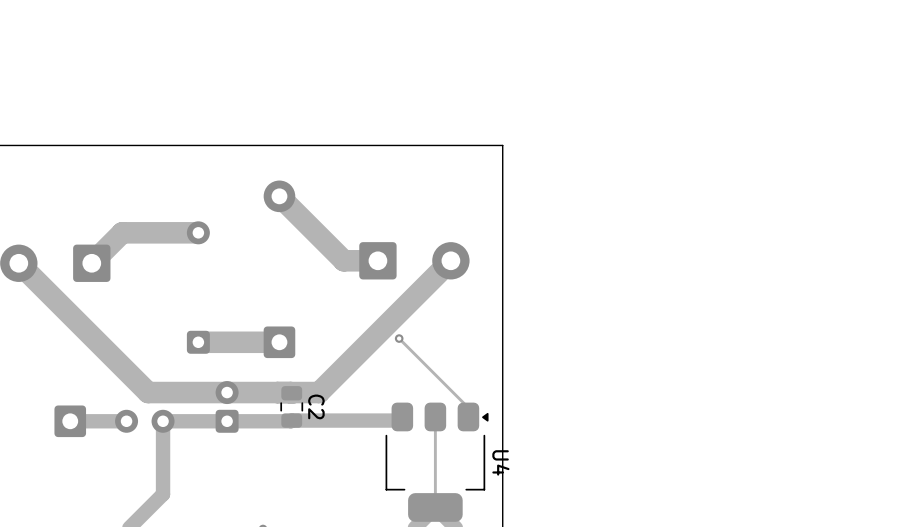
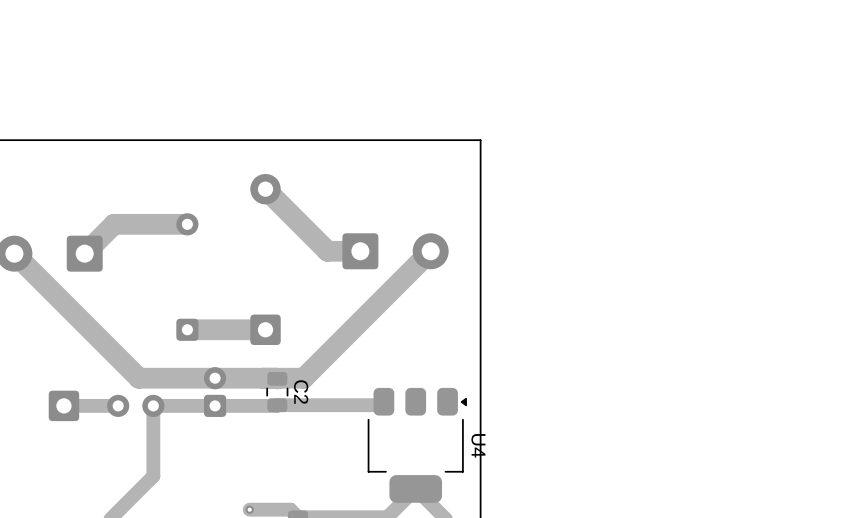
track: (399, 338) (468, 407) (468, 416) -> none
via: (399, 338) -> none
track: (435, 416) (435, 507) -> none

